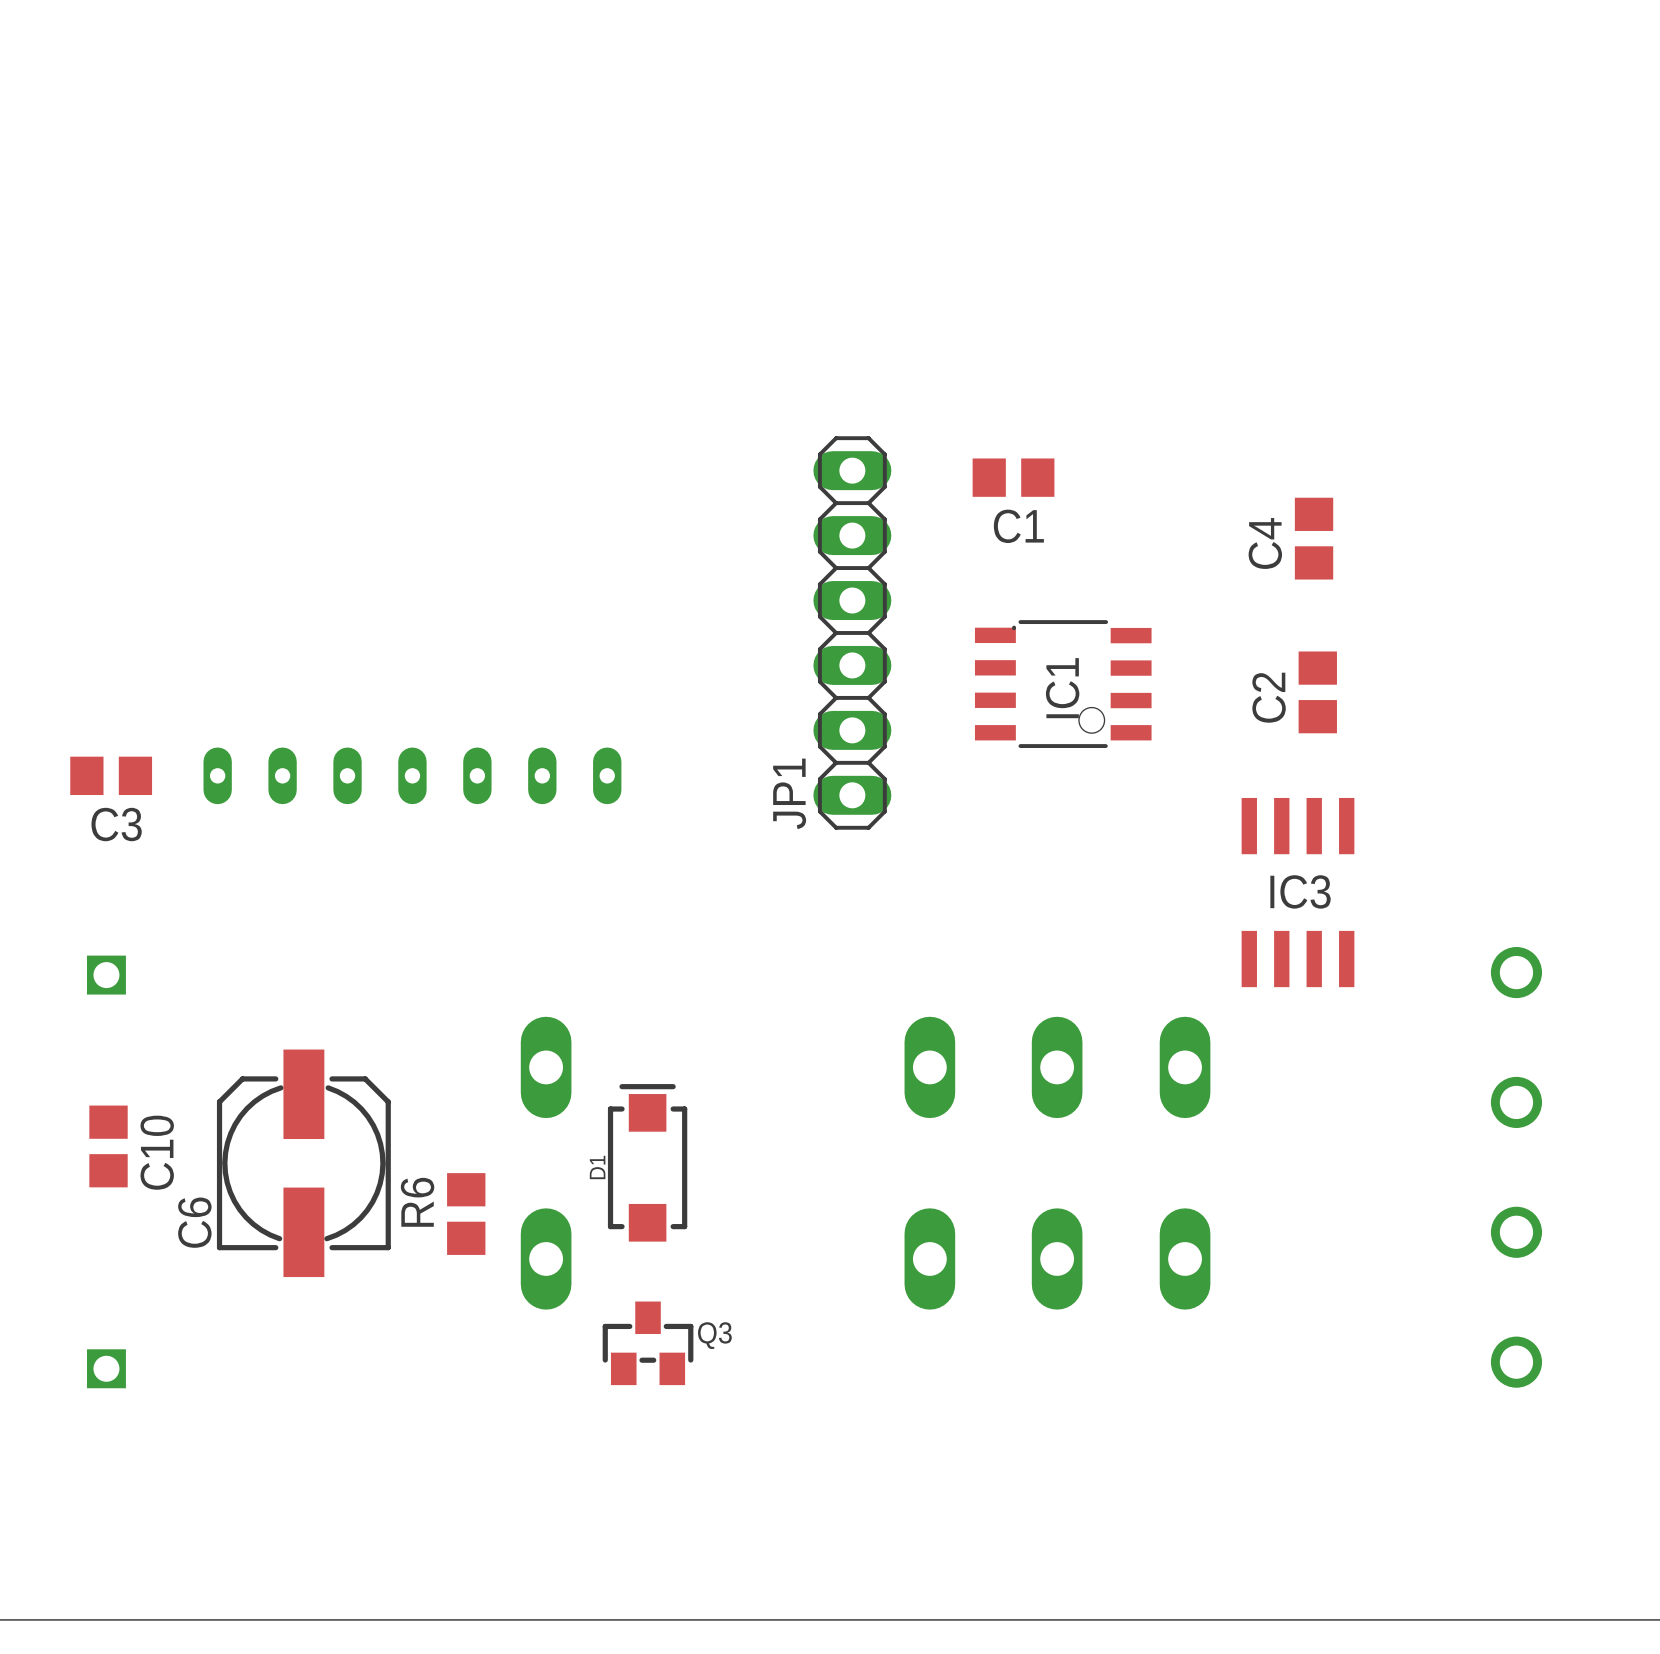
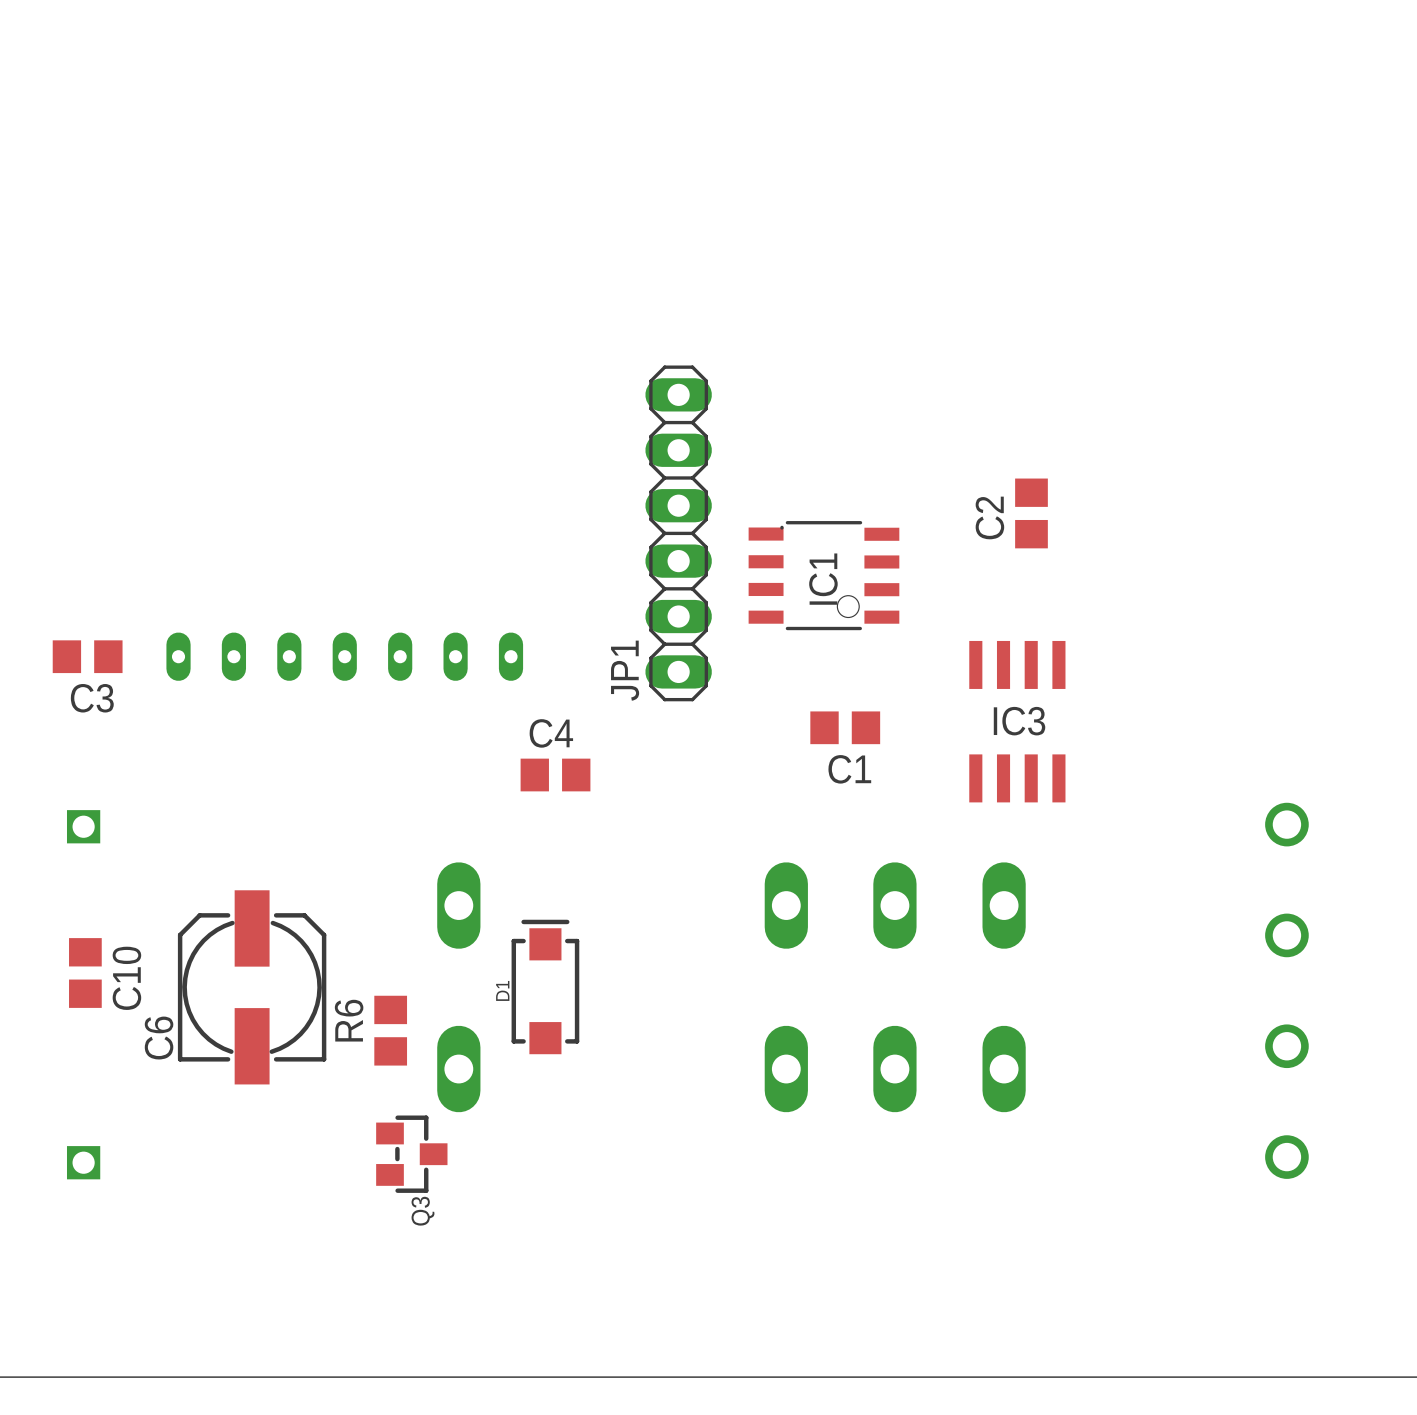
C1 position: (1013, 477) -> (845, 727)
C4 rotation: 0° (1314, 538) -> 90° clockwise (555, 775)
C4 position: (1314, 538) -> (555, 775)
JP1 position: (852, 632) -> (678, 533)
IC1 position: (1063, 684) -> (823, 575)
C2 position: (1317, 692) -> (1031, 513)
IC3 position: (1298, 892) -> (1017, 721)
Q3 rotation: 0° (648, 1343) -> 90° clockwise (411, 1154)
Q3 position: (648, 1343) -> (411, 1154)

